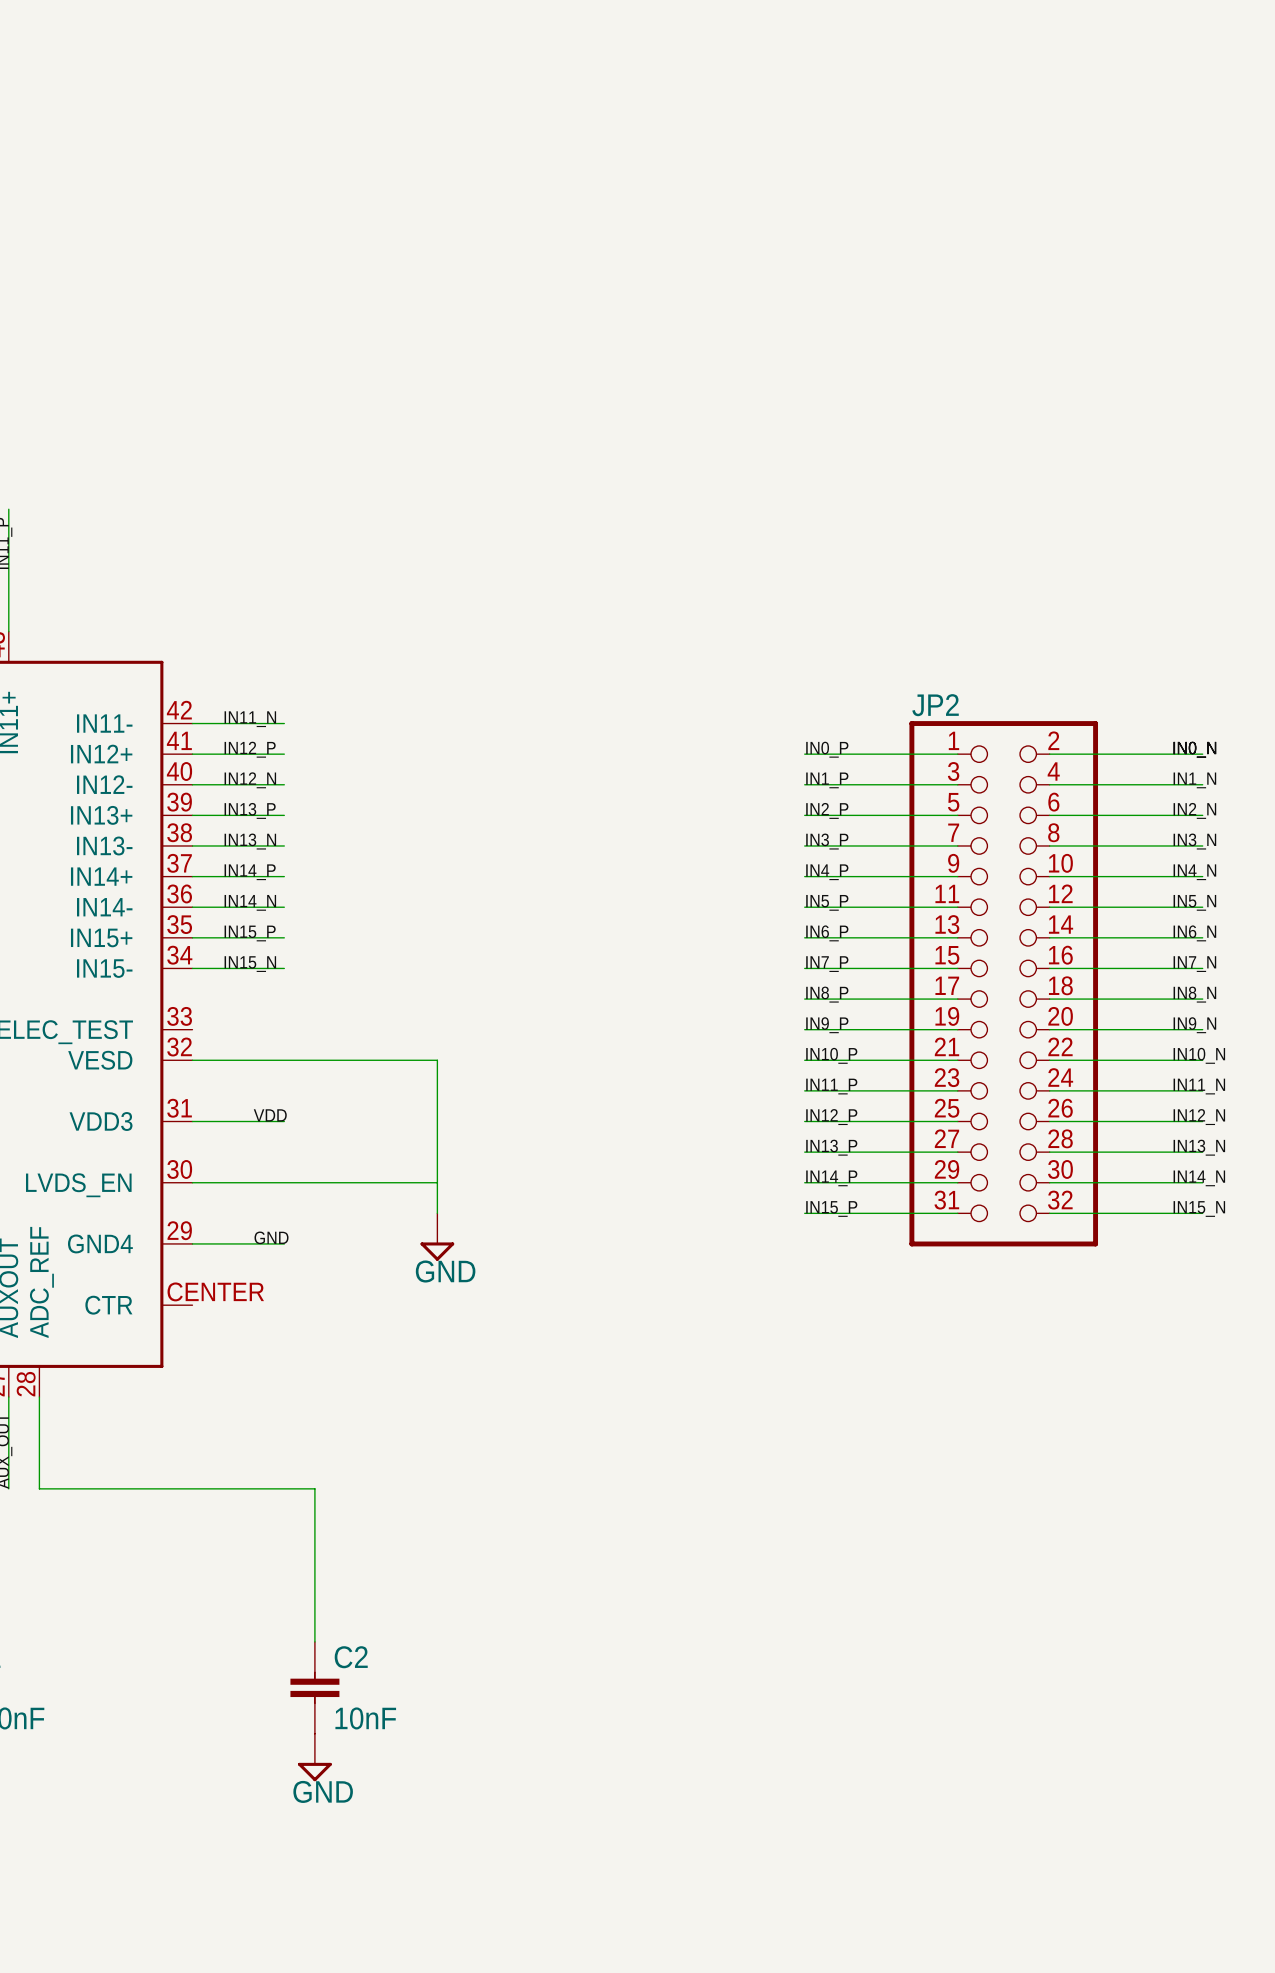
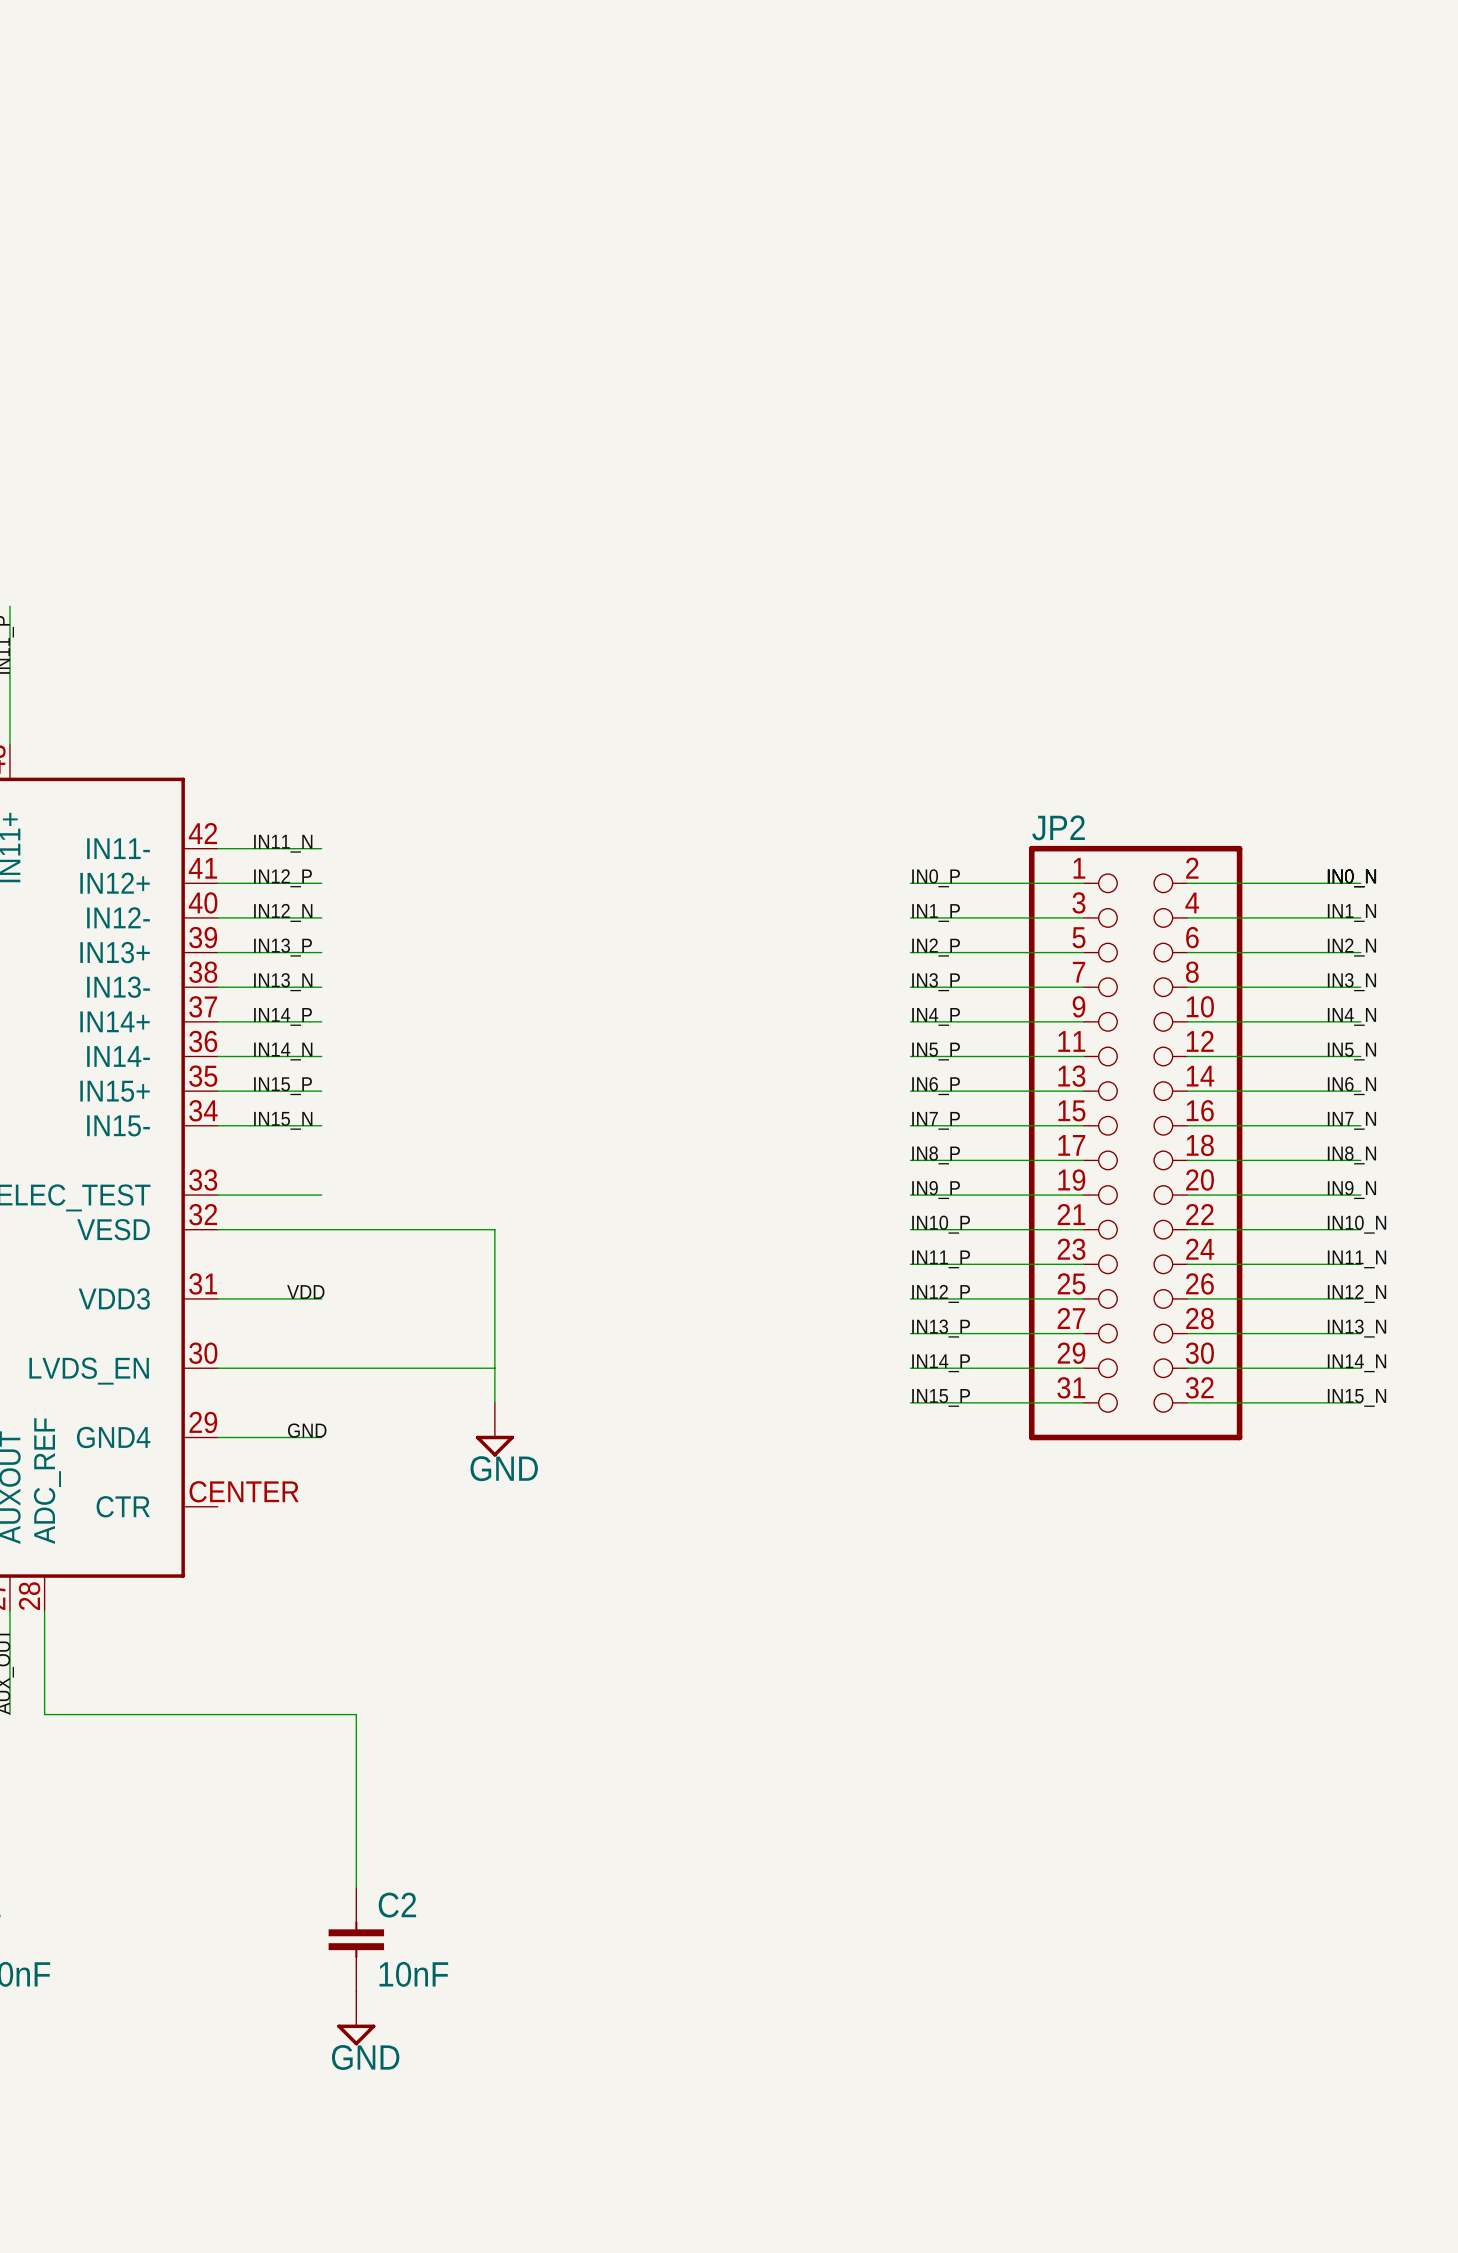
wire: none -> (217, 1195) (321, 1195)

